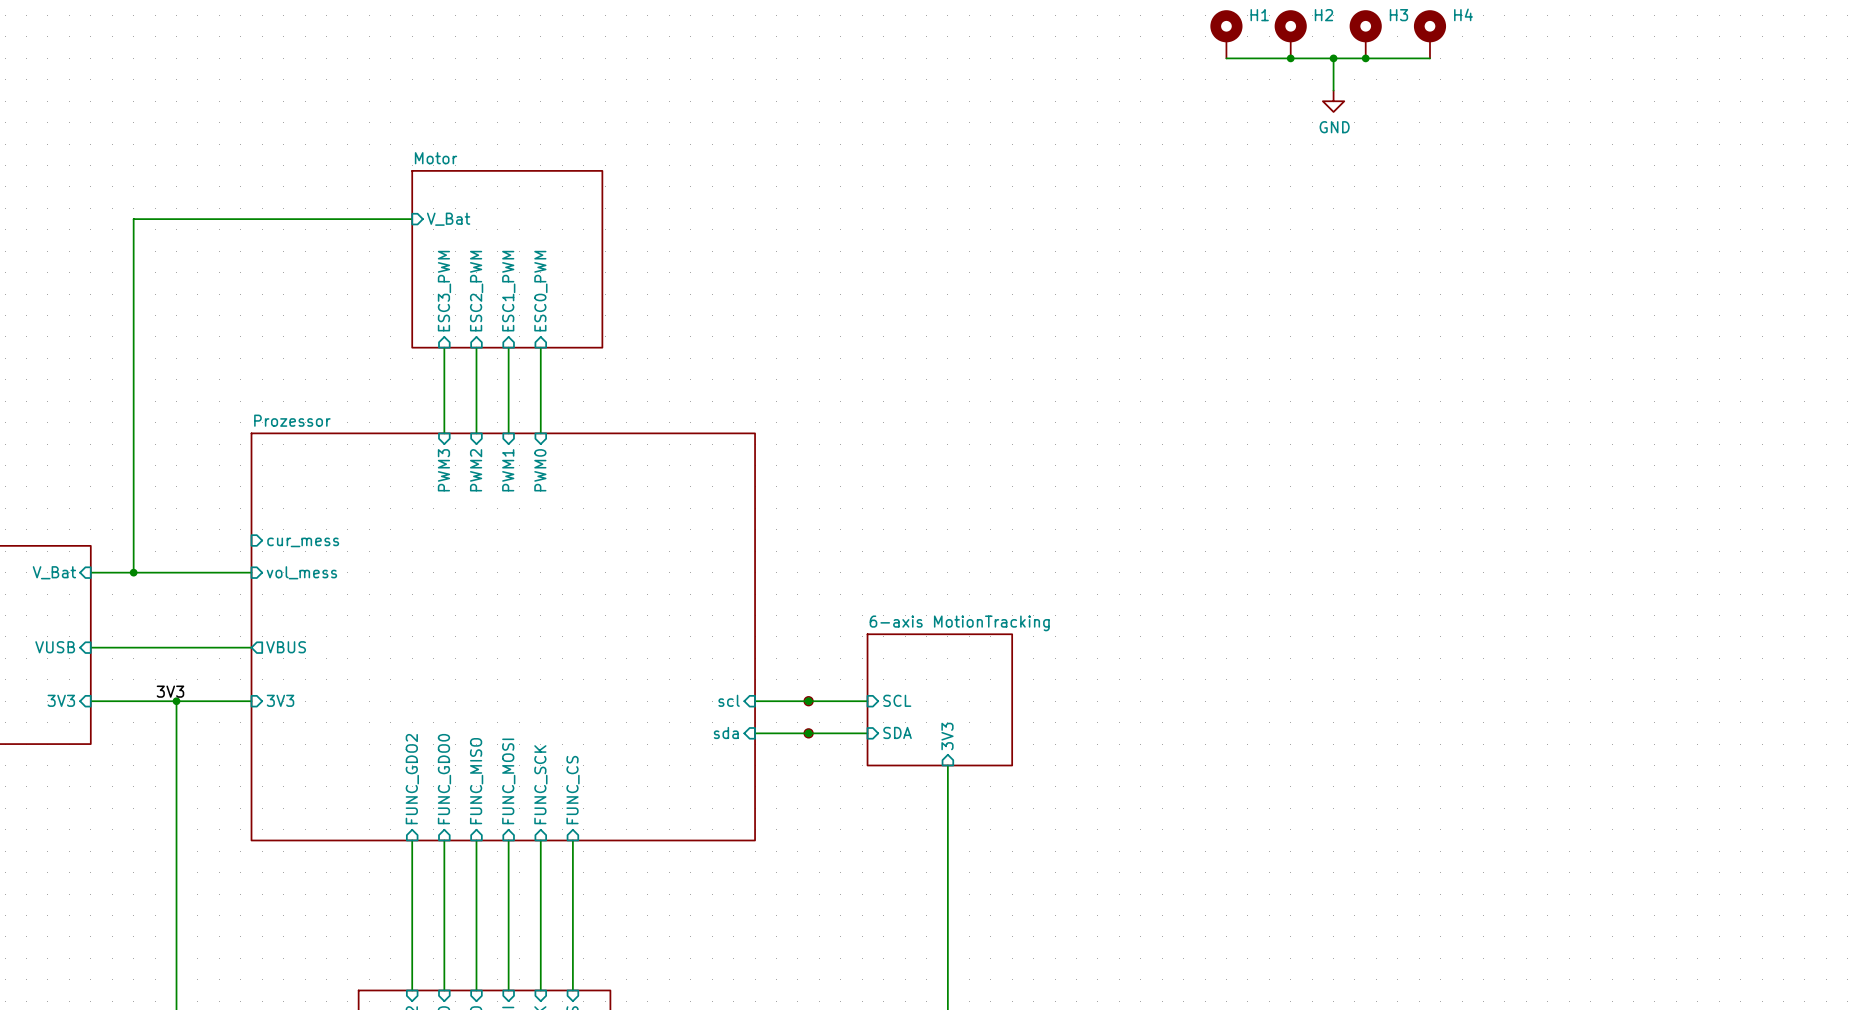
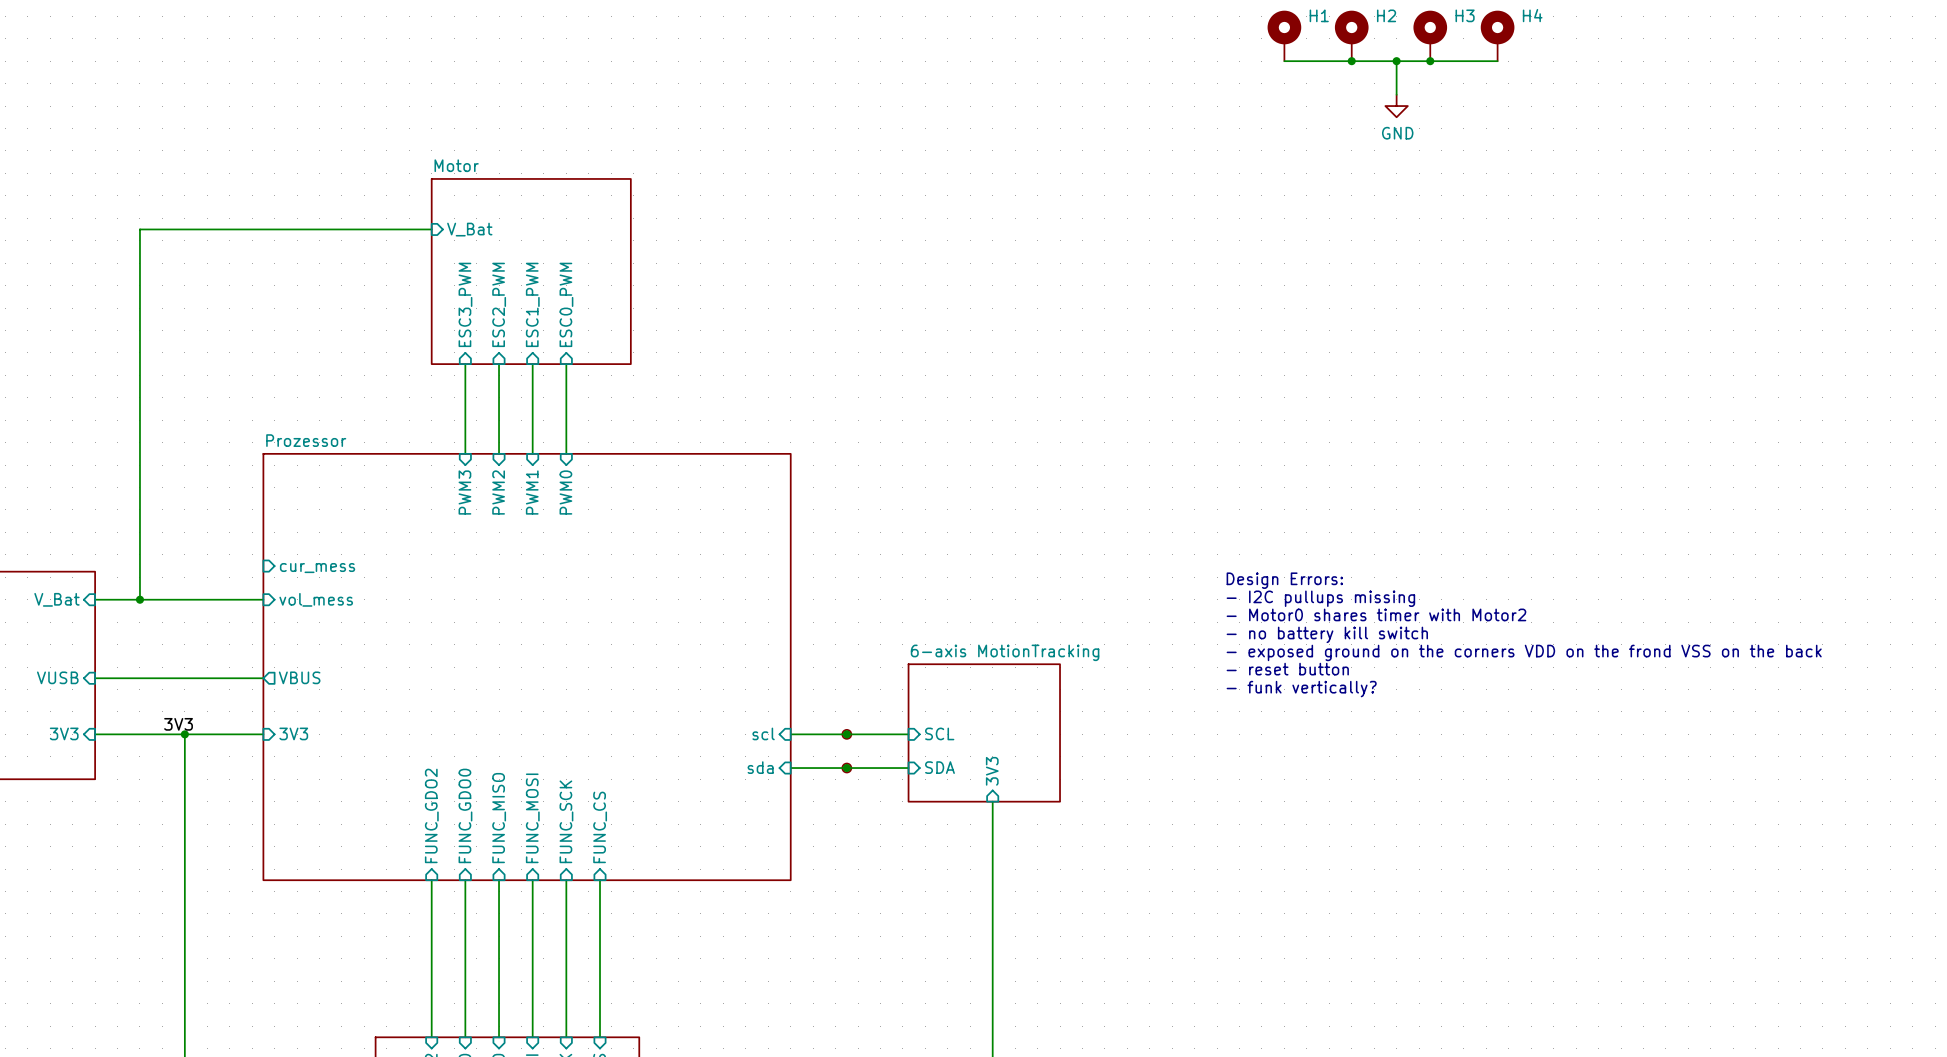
text: none -> Design Errors: (1284, 580)
text: none -> - I2C pullups missing (1320, 598)
text: none -> - Motor0 shares timer with Motor2 (1376, 614)
text: none -> - no battery kill switch (1327, 634)
text: none -> - exposed ground on the corners VDD on the frond VSS on the back (1524, 652)
text: none -> - reset button (1287, 669)
text: none -> - funk vertically? (1301, 689)

